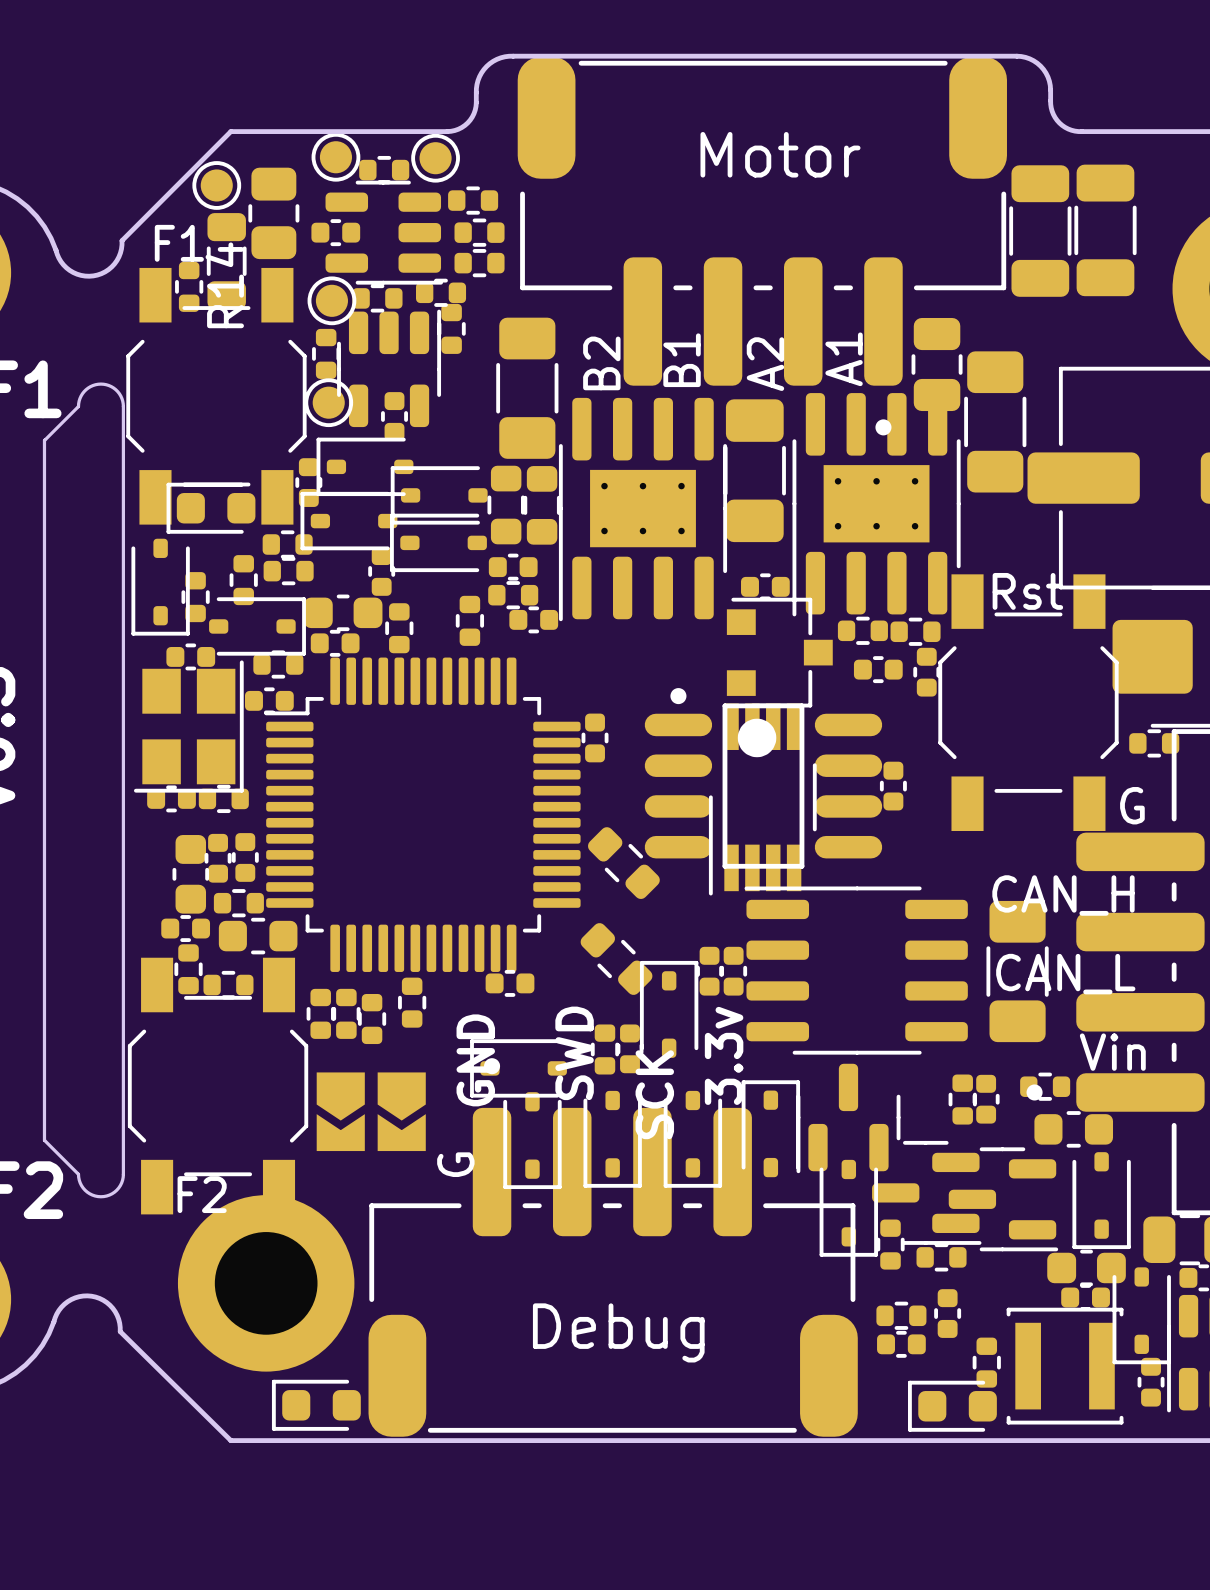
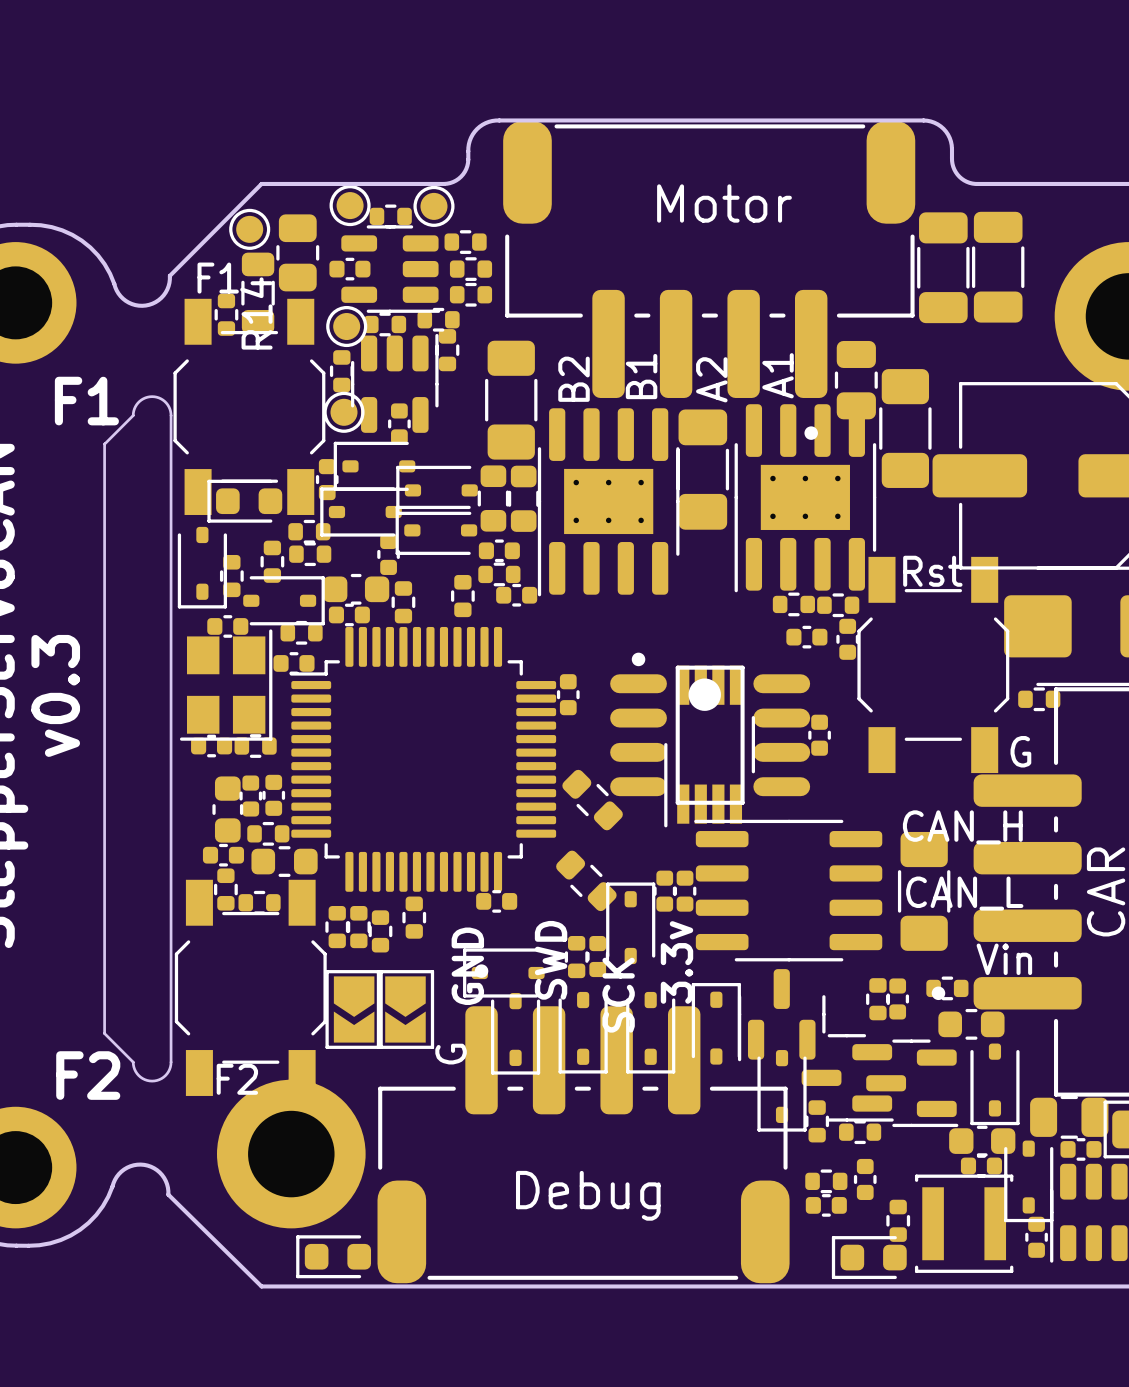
part: (765, 586) -> none
part: (779, 652) -> none
part footprint: [316, 1072, 365, 1152] -> [325, 970, 383, 1049]
part footprint: [377, 1072, 426, 1152] -> [376, 970, 435, 1049]

